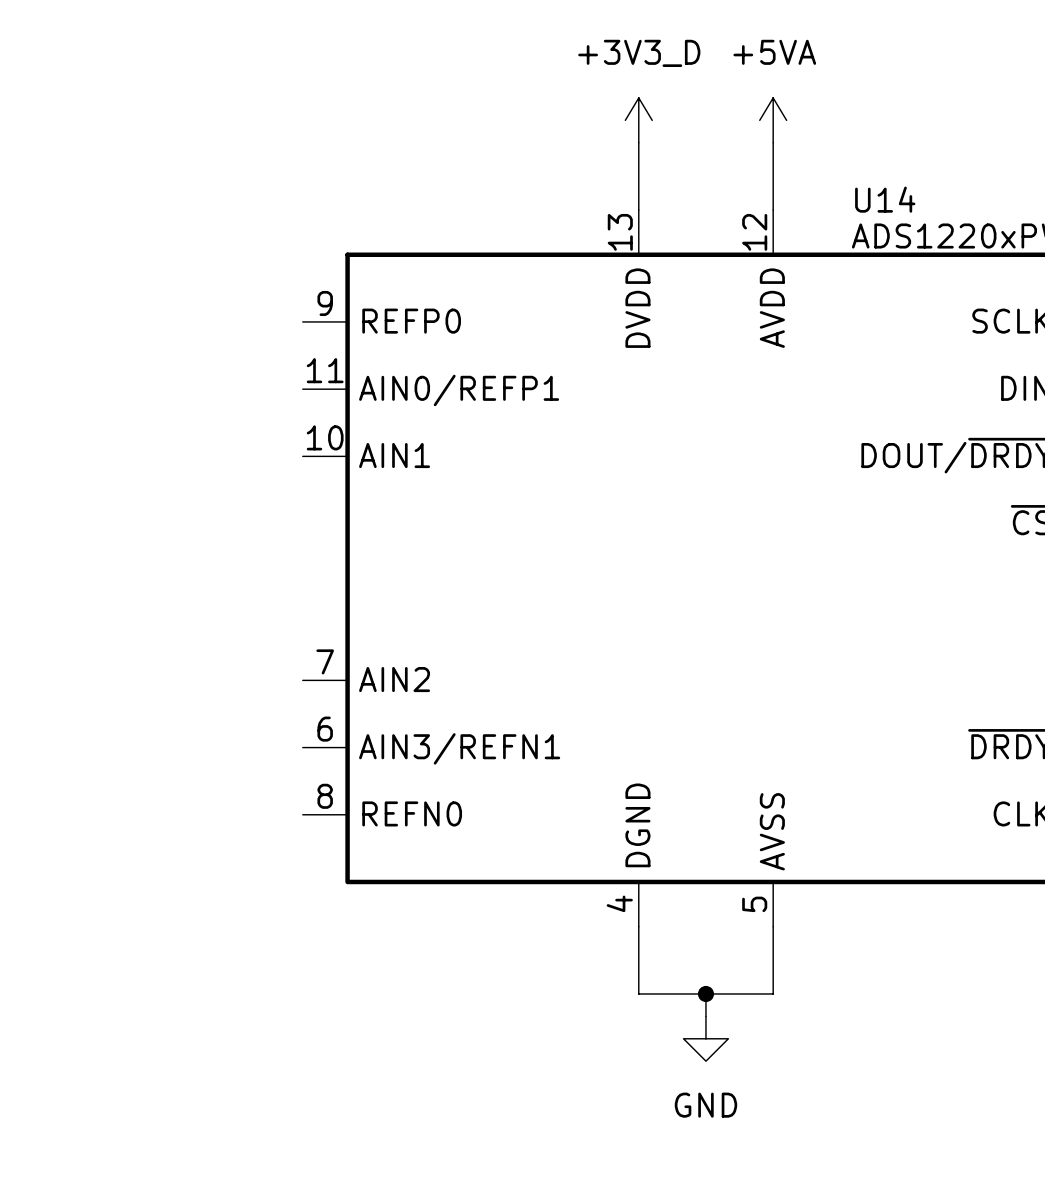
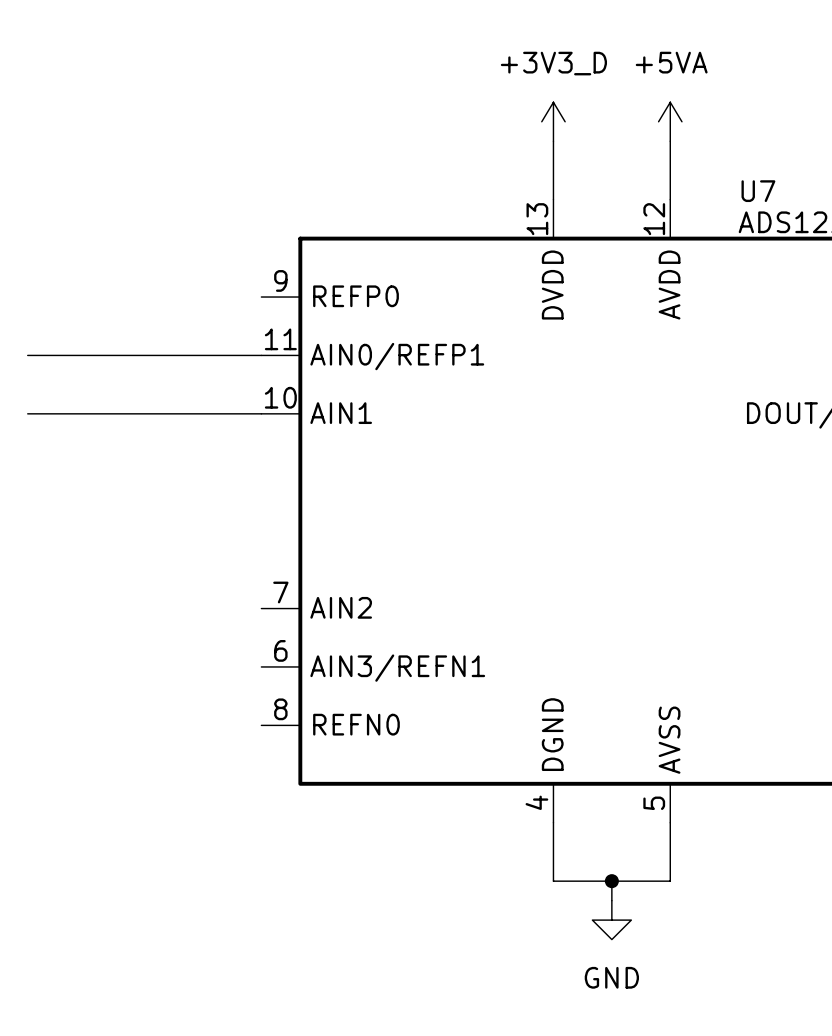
U14 name: U14 (885, 199) -> U7 (758, 191)
wire: none -> (27, 355) (261, 355)
wire: none -> (27, 413) (261, 413)

